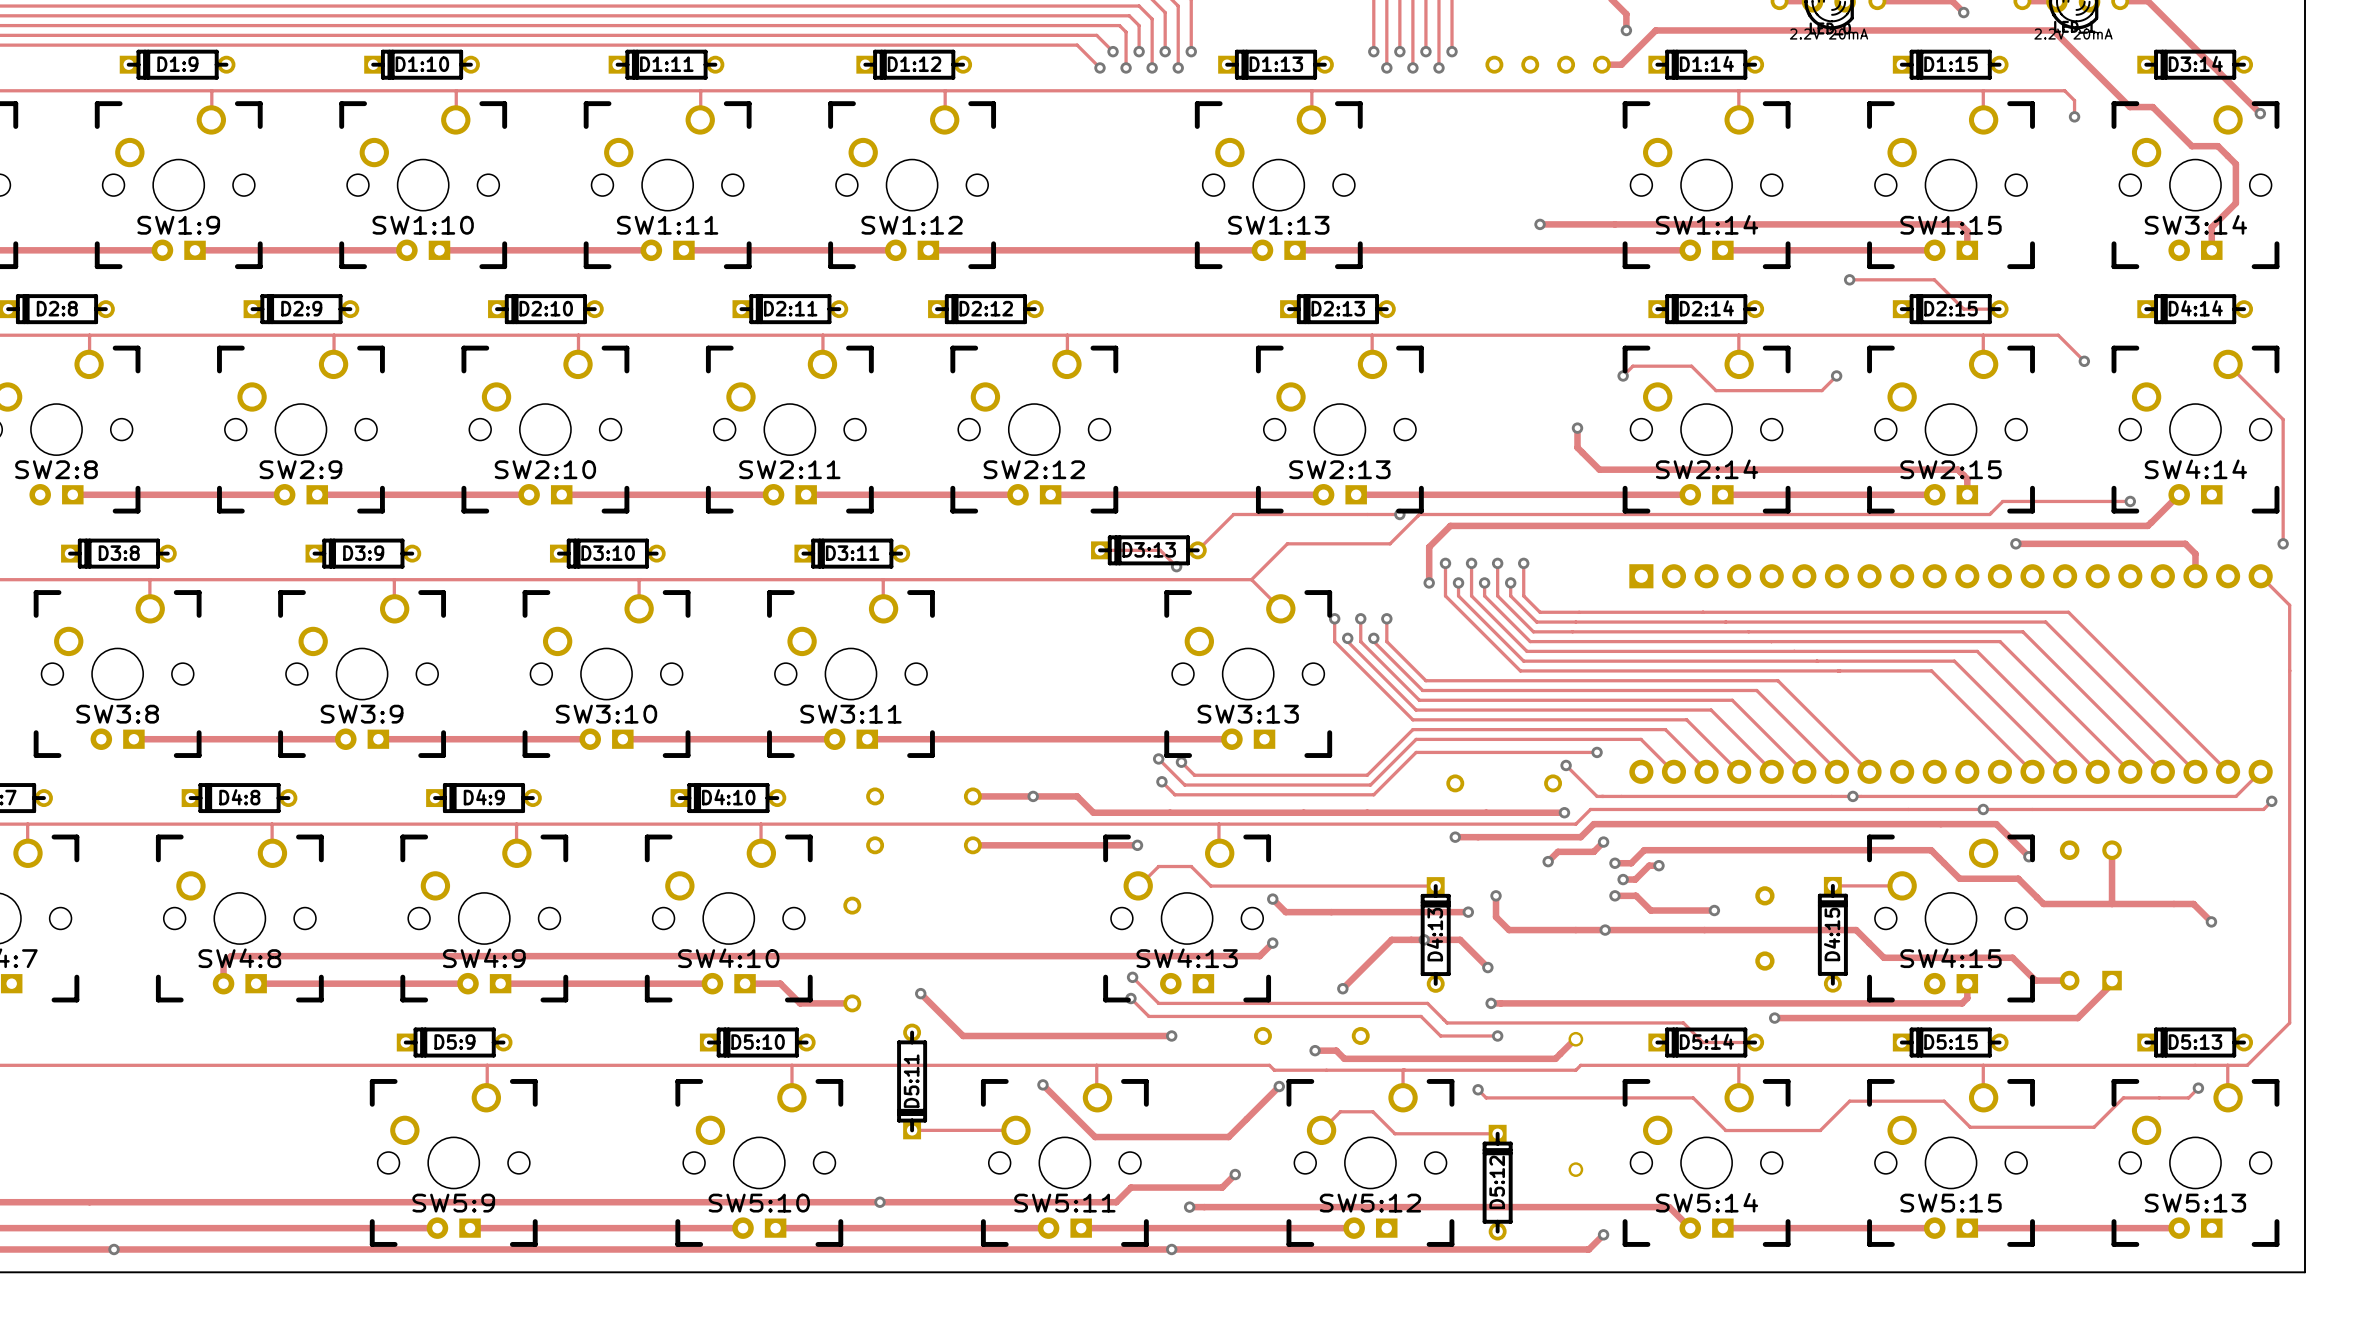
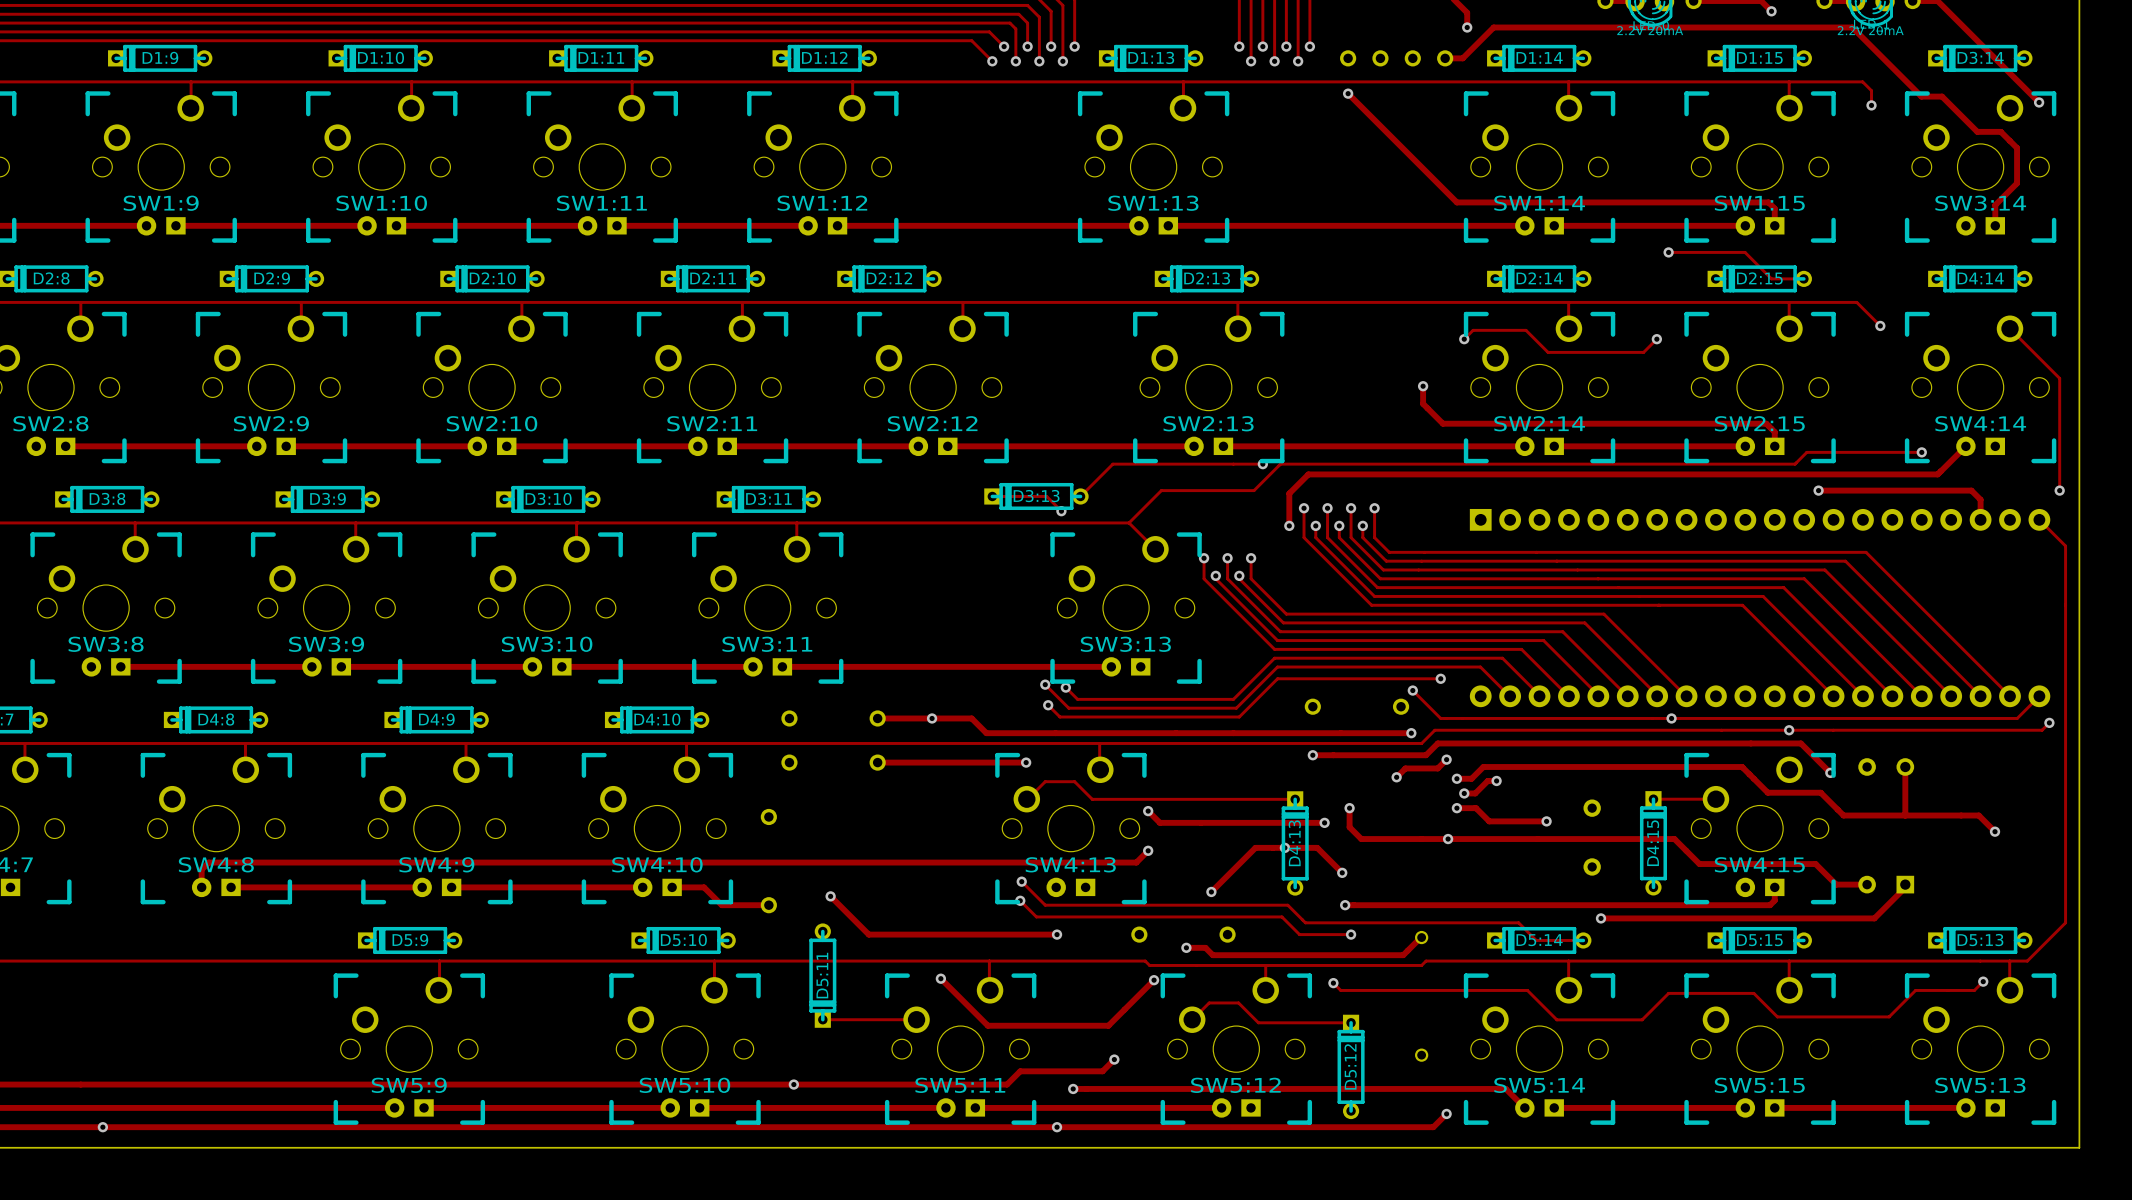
via: none -> (1348, 93)
track: (1540, 224) (1614, 224) -> (1348, 93) (1456, 202)
via: (1540, 224) -> none

